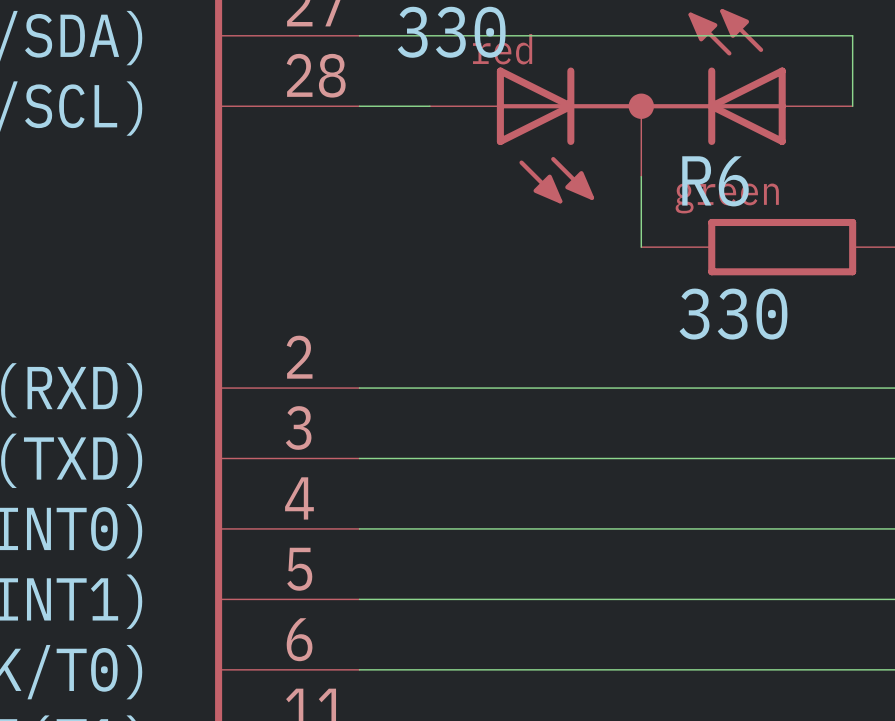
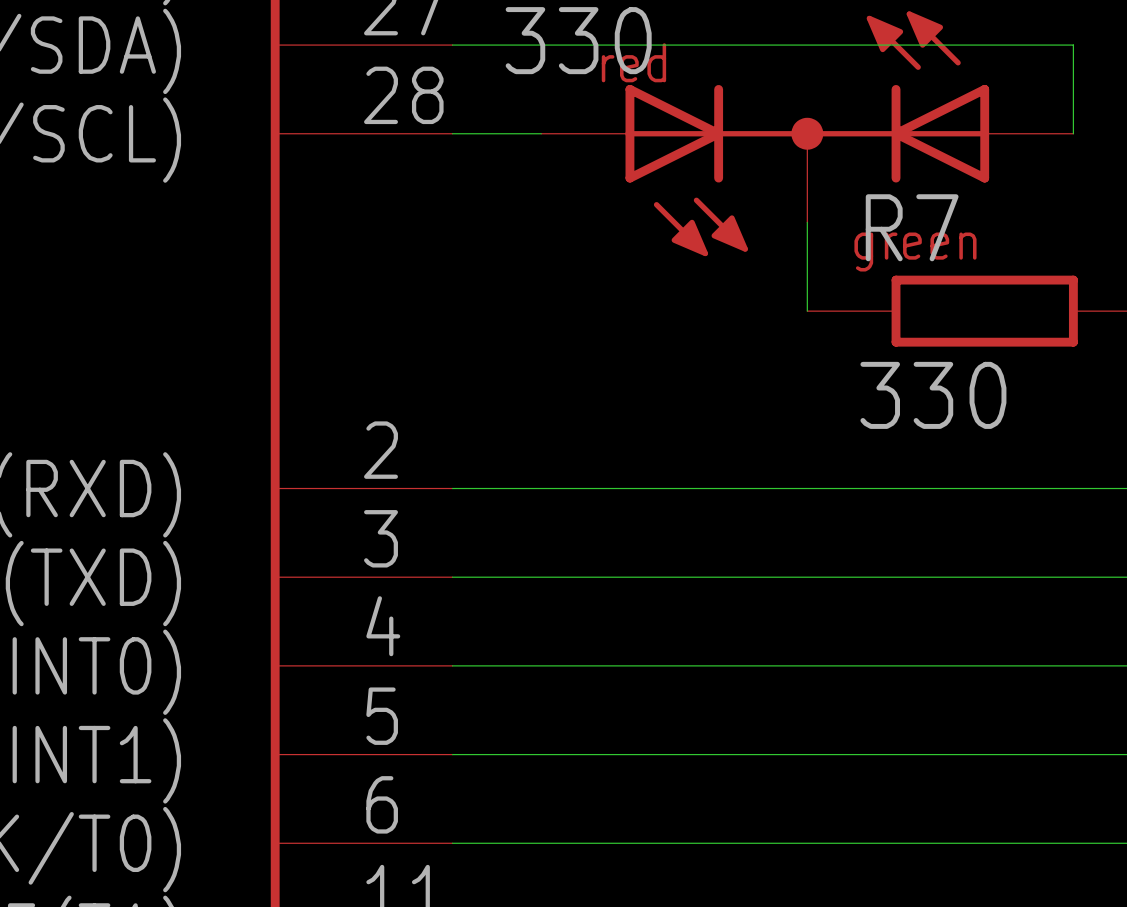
R6 name: R6 (715, 181) -> R7 (912, 227)

